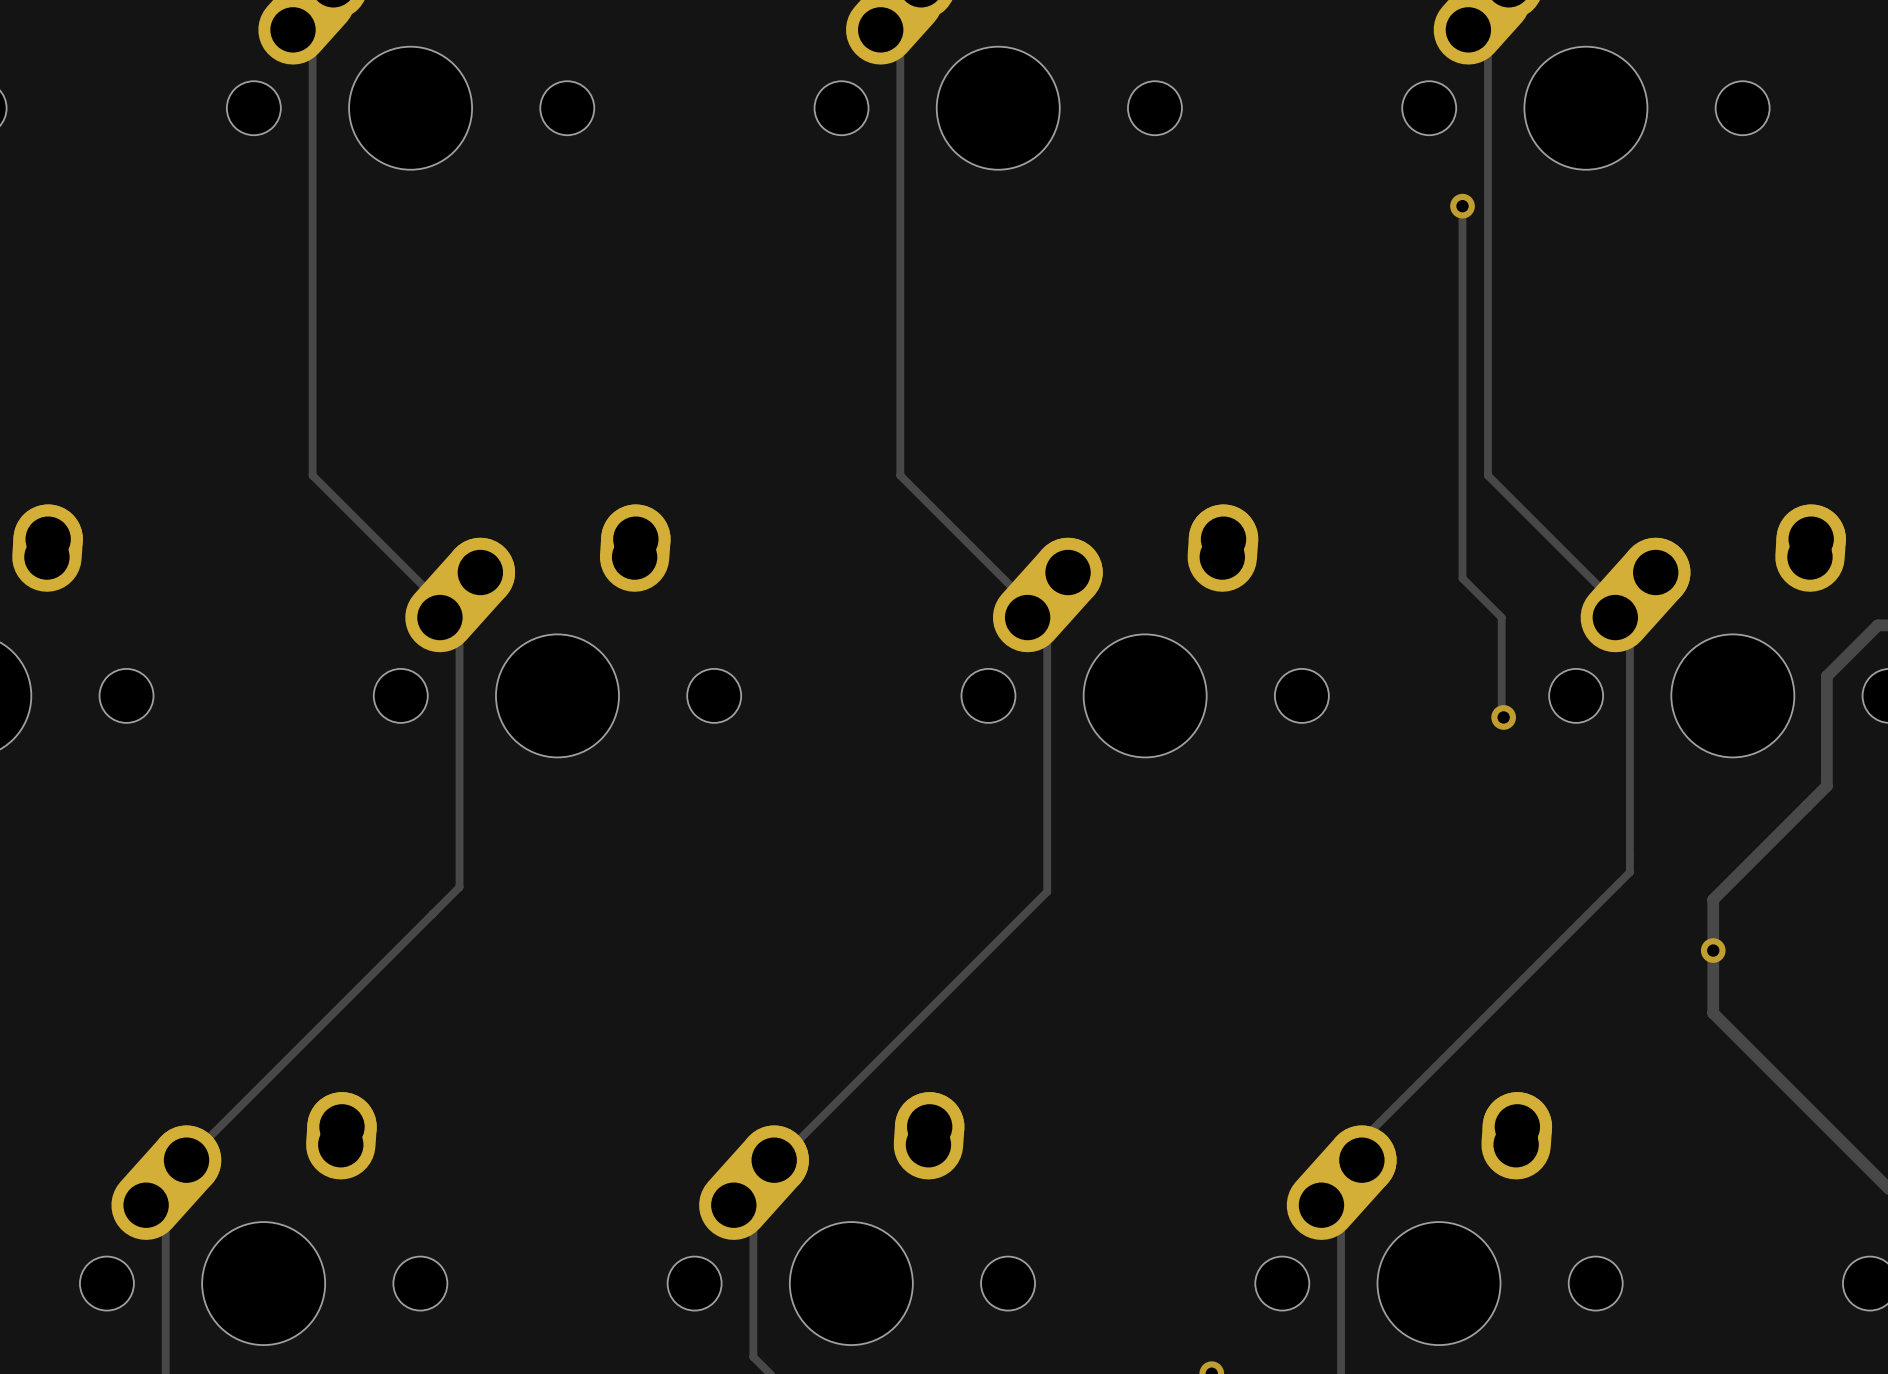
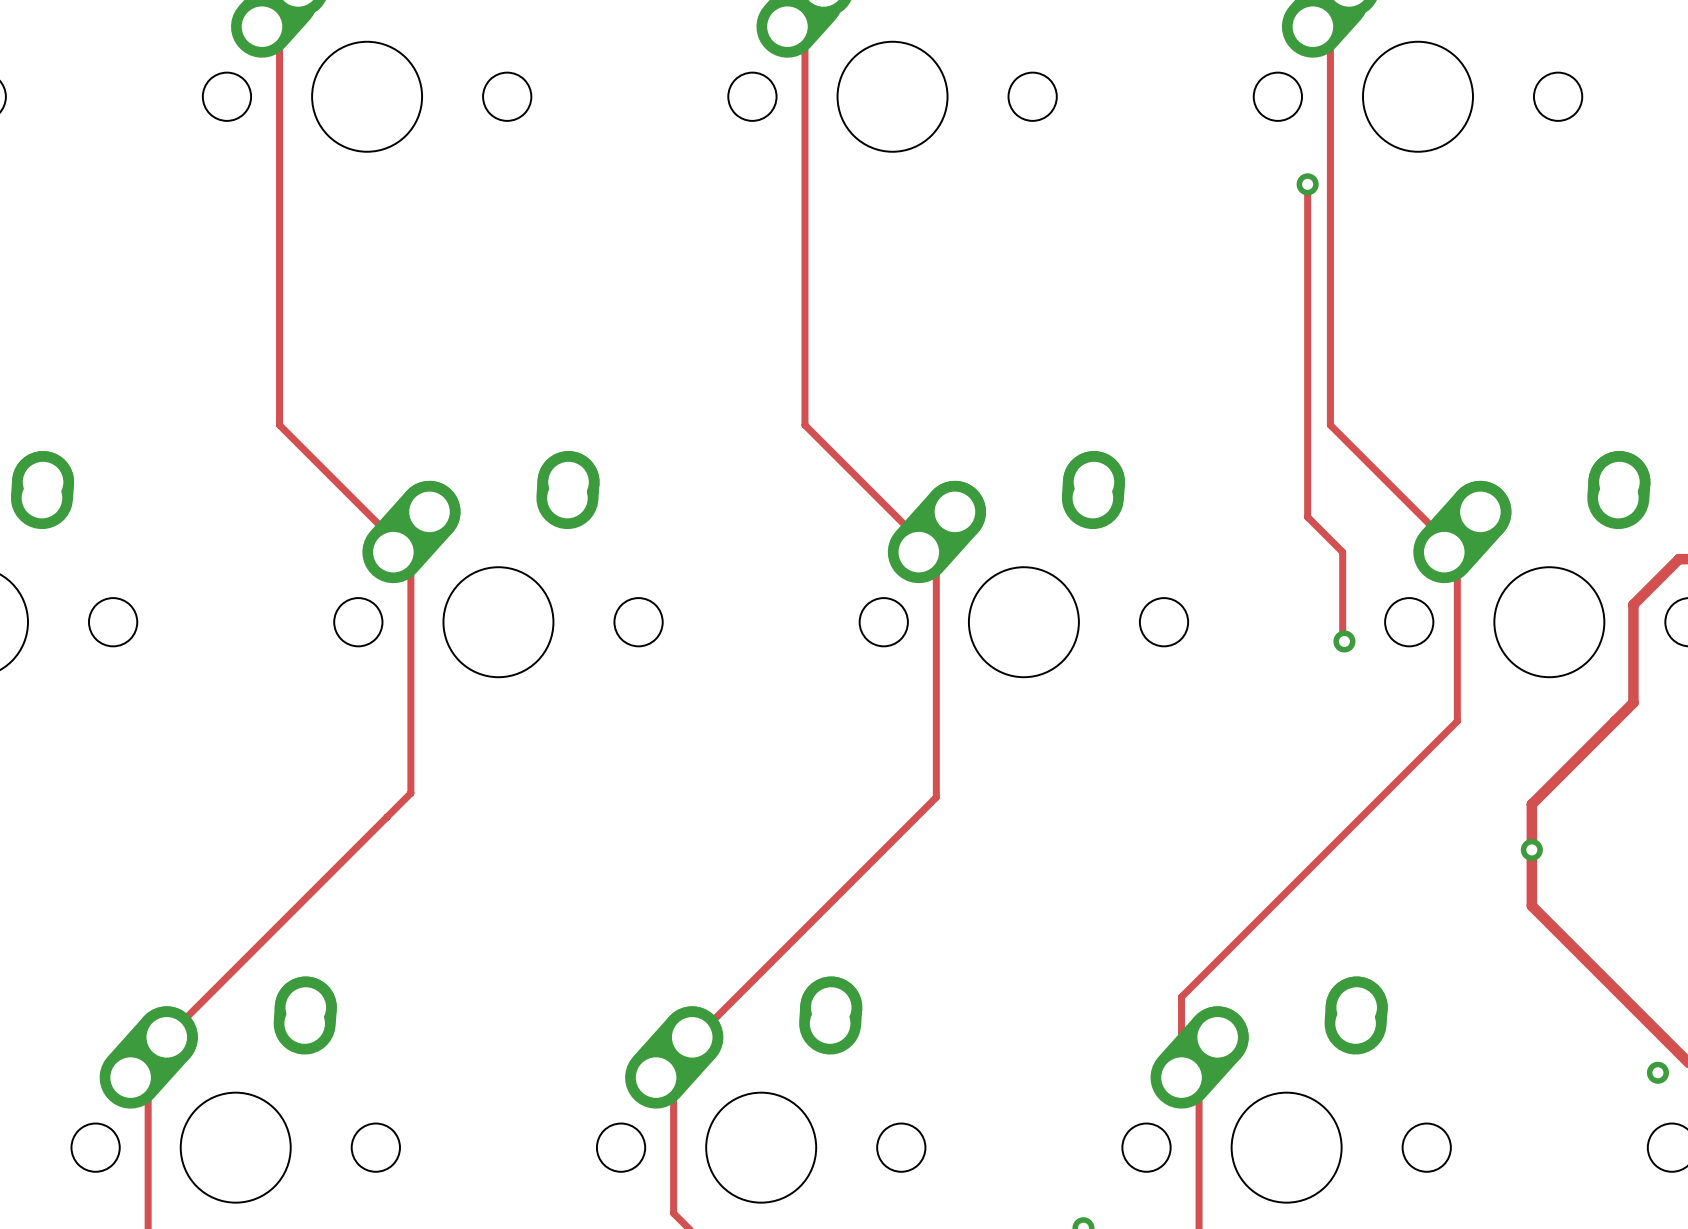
track: (1629, 806) (1629, 872) (1321, 1180) -> (1457, 721) (1181, 997) (1181, 1055)
via: none -> (1657, 1072)

